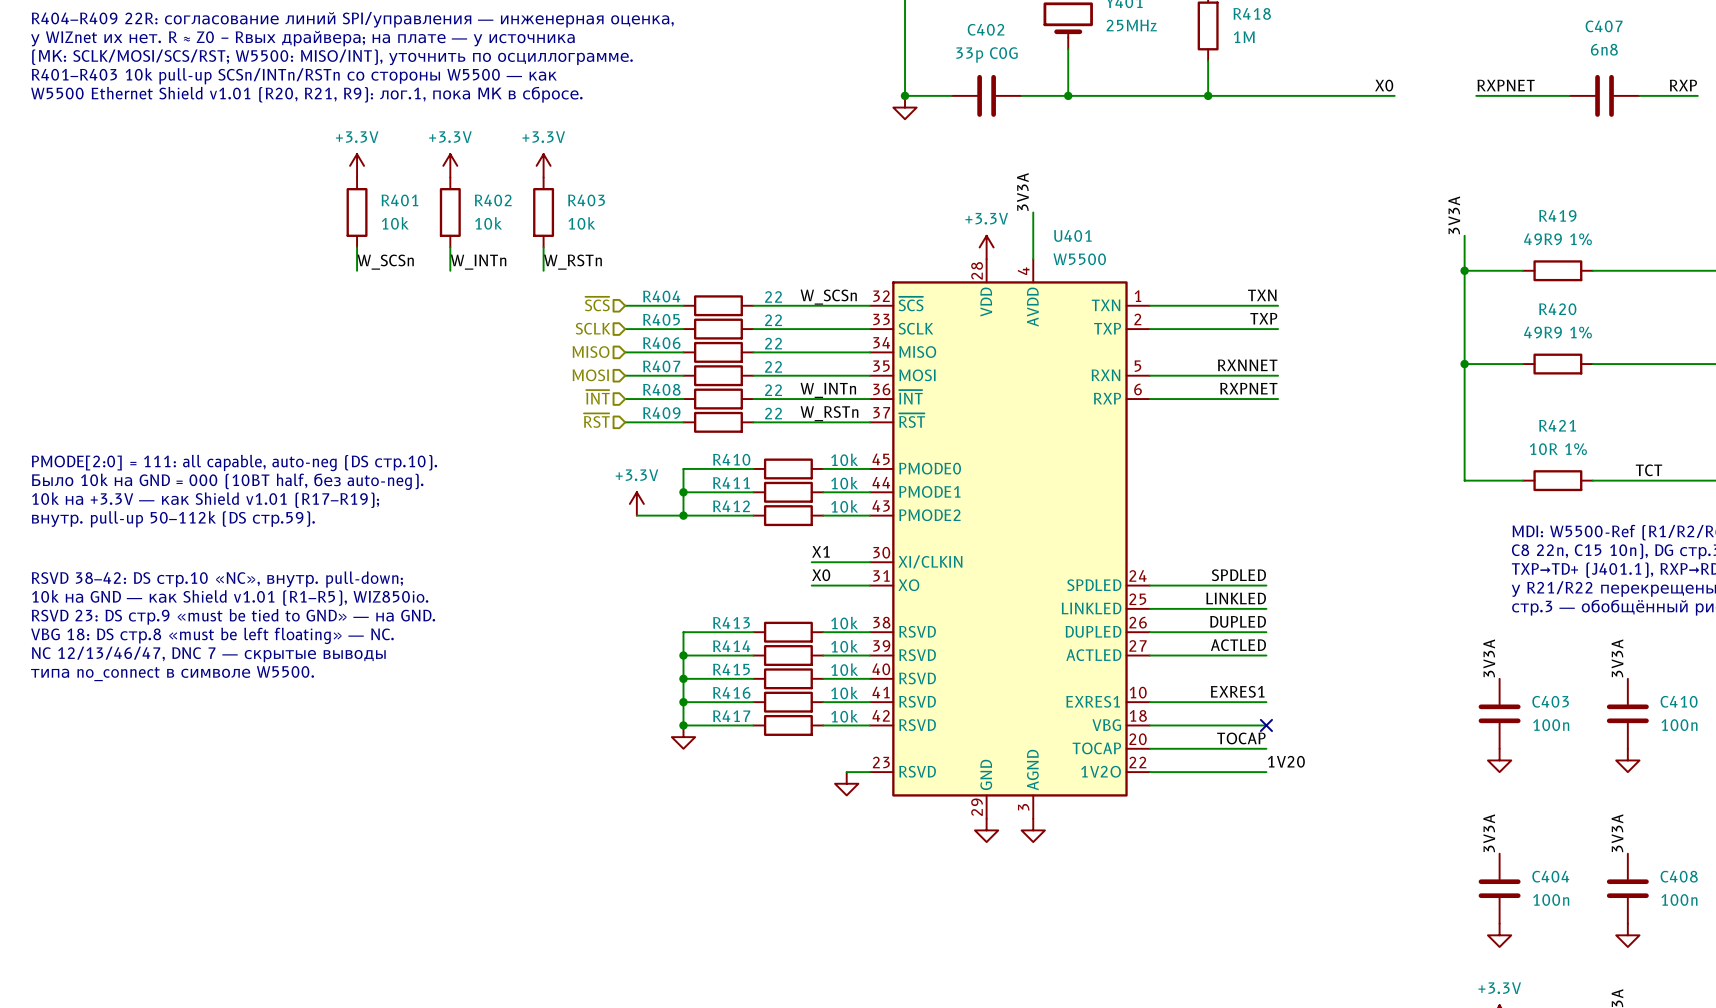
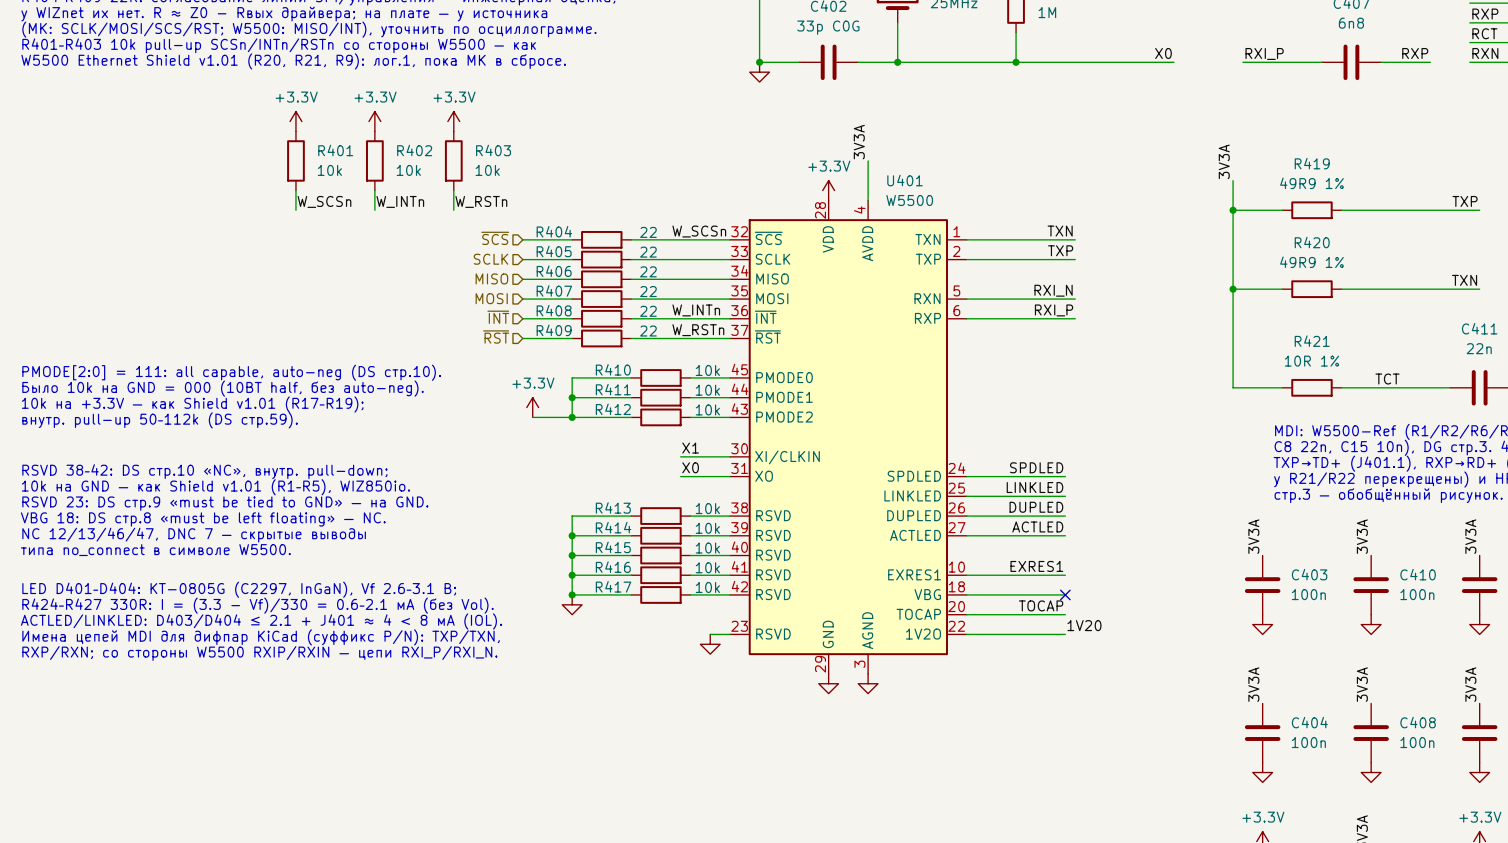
label: RXPNET (1506, 85) -> RXI_P (1264, 53)
label: RXNNET (1247, 365) -> RXI_N (1053, 290)
label: RXPNET (1248, 388) -> RXI_P (1054, 310)
text: none -> LED D401–D404: KT-0805G (C2297, InGaN), Vf 2.6–3.1 В; (239, 589)
text: none -> R424–R427 330R: I = (3.3 − Vf)/330 = 0.6–2.1 мА (без Vol). (258, 605)
text: none -> ACTLED/LINKLED: D403/D404 ≤ 2.1 + J401 ≈ 4 < 8 мА (IOL). (261, 621)
text: none -> Имена цепей MDI для дифпар KiCad (суффикс P/N): TXP/TXN, (261, 637)
text: none -> RXP/RXN; со стороны W5500 RXIP/RXIN — цепи RXI_P/RXI_N. (259, 653)

